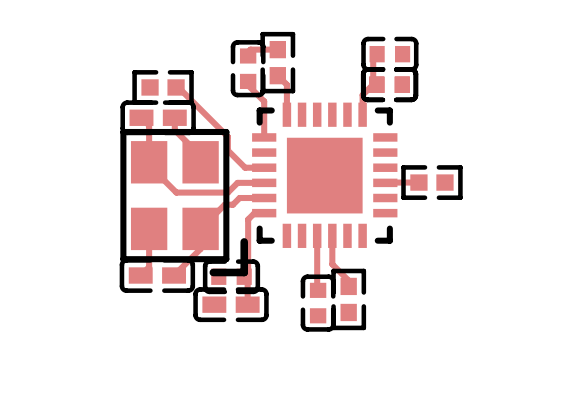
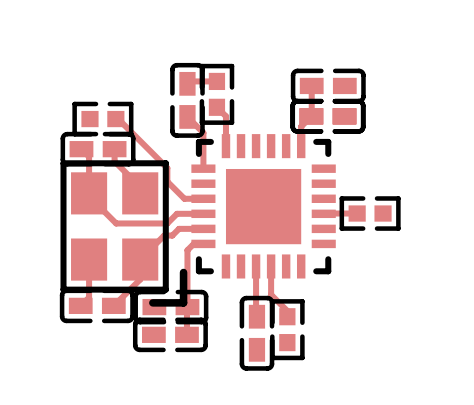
part footprint: [361, 36, 419, 72] -> [290, 68, 366, 104]
part footprint: [230, 40, 266, 98] -> [170, 62, 205, 138]
part footprint: [360, 67, 419, 103] -> [290, 99, 366, 134]
part footprint: [202, 259, 261, 295] -> [133, 289, 209, 325]
part footprint: [300, 274, 336, 332] -> [239, 295, 275, 371]

